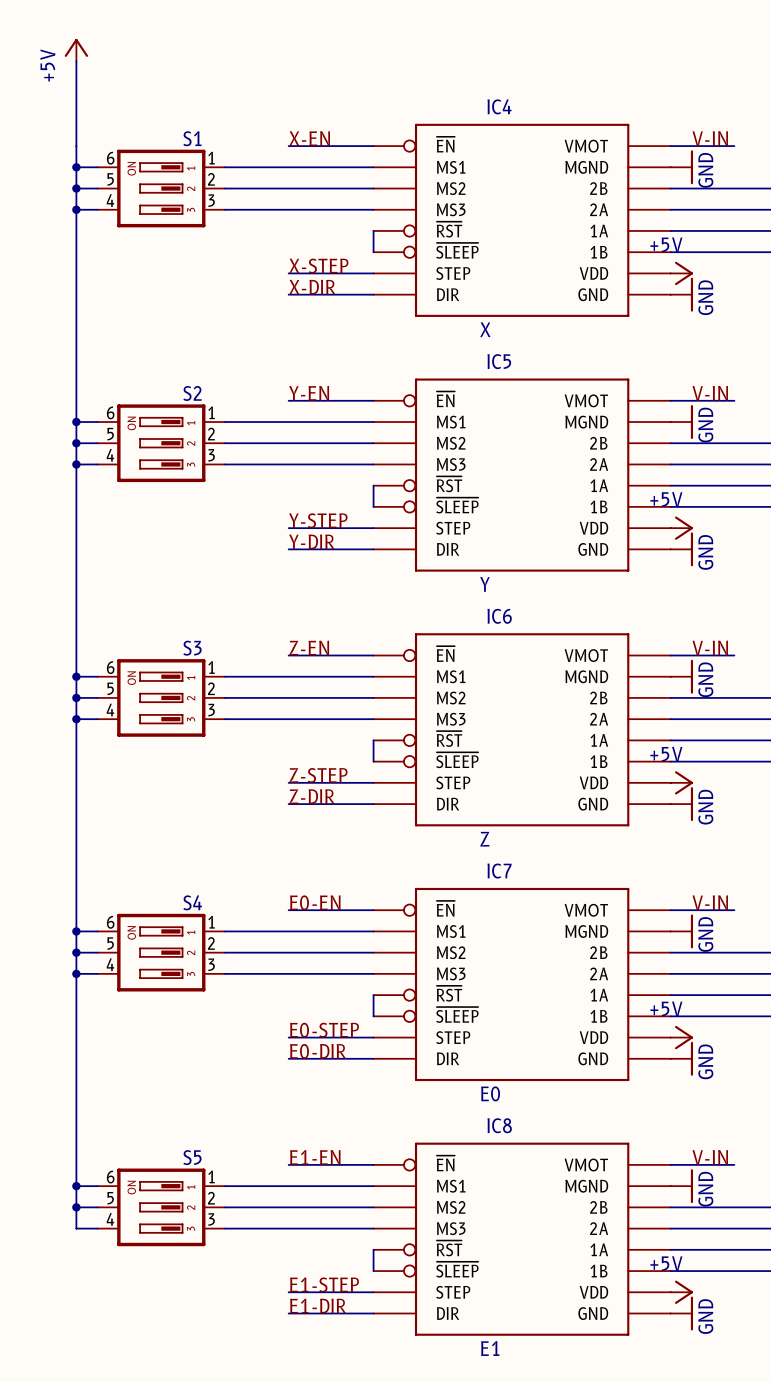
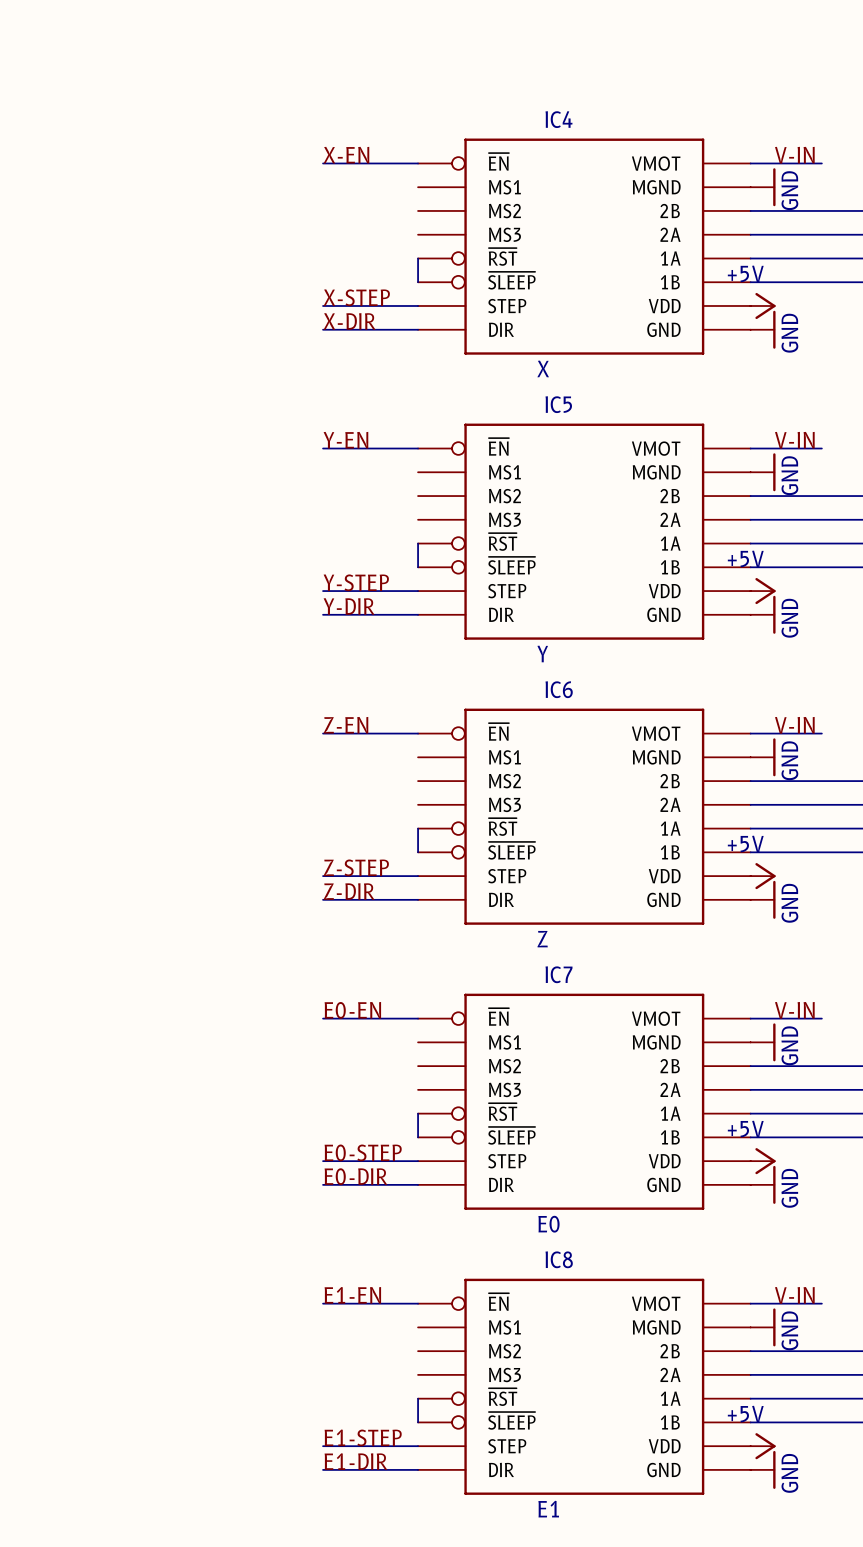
power symbol: +5V (76, 50) -> none
wire: (76, 61) (76, 1228) (97, 1228) -> none
wire: (76, 167) (97, 167) -> none
junction: (76, 167) -> none
wire: (224, 167) (373, 167) -> none
wire: (76, 188) (97, 188) -> none
junction: (76, 188) -> none
S1: (161, 188) -> none
wire: (224, 188) (373, 188) -> none
wire: (76, 209) (97, 209) -> none
junction: (76, 209) -> none
wire: (224, 209) (373, 209) -> none
wire: (76, 422) (97, 422) -> none
junction: (76, 422) -> none
wire: (224, 422) (373, 422) -> none
wire: (76, 443) (97, 443) -> none
junction: (76, 443) -> none
S2: (161, 443) -> none
wire: (224, 443) (373, 443) -> none
wire: (76, 464) (97, 464) -> none
junction: (76, 464) -> none
wire: (224, 464) (373, 464) -> none
wire: (76, 676) (97, 676) -> none
junction: (76, 676) -> none
wire: (224, 676) (373, 676) -> none
wire: (76, 697) (97, 697) -> none
junction: (76, 697) -> none
S3: (161, 697) -> none
wire: (224, 697) (373, 697) -> none
wire: (76, 719) (97, 719) -> none
junction: (76, 719) -> none
wire: (224, 719) (373, 719) -> none
wire: (76, 931) (97, 931) -> none
junction: (76, 931) -> none
wire: (224, 931) (373, 931) -> none
wire: (76, 952) (97, 952) -> none
junction: (76, 952) -> none
S4: (161, 952) -> none
wire: (224, 952) (373, 952) -> none
wire: (76, 973) (97, 973) -> none
junction: (76, 973) -> none
wire: (224, 973) (373, 973) -> none
wire: (76, 1186) (97, 1186) -> none
junction: (76, 1186) -> none
wire: (224, 1186) (373, 1186) -> none
wire: (76, 1207) (97, 1207) -> none
junction: (76, 1207) -> none
S5: (161, 1207) -> none
wire: (224, 1207) (373, 1207) -> none
wire: (224, 1228) (373, 1228) -> none

